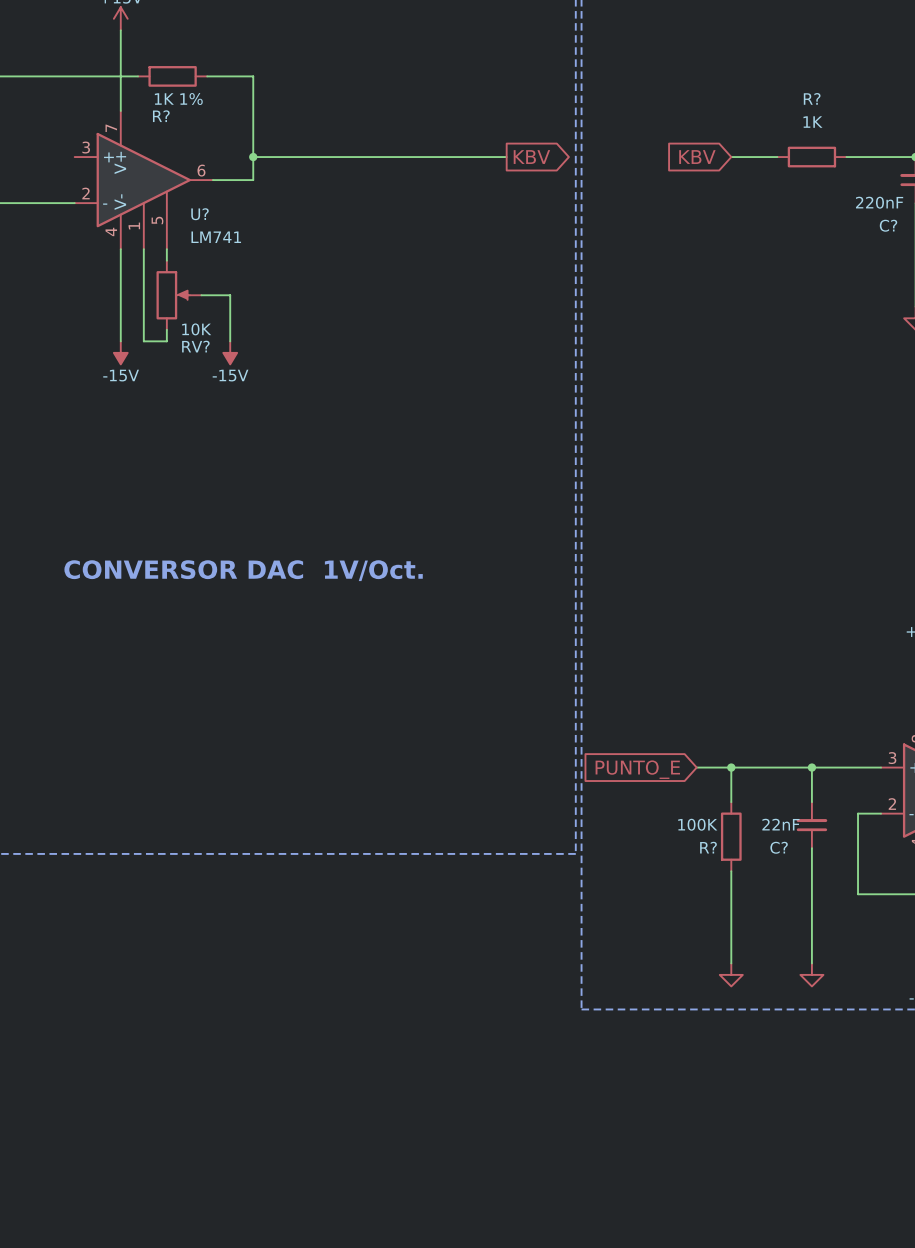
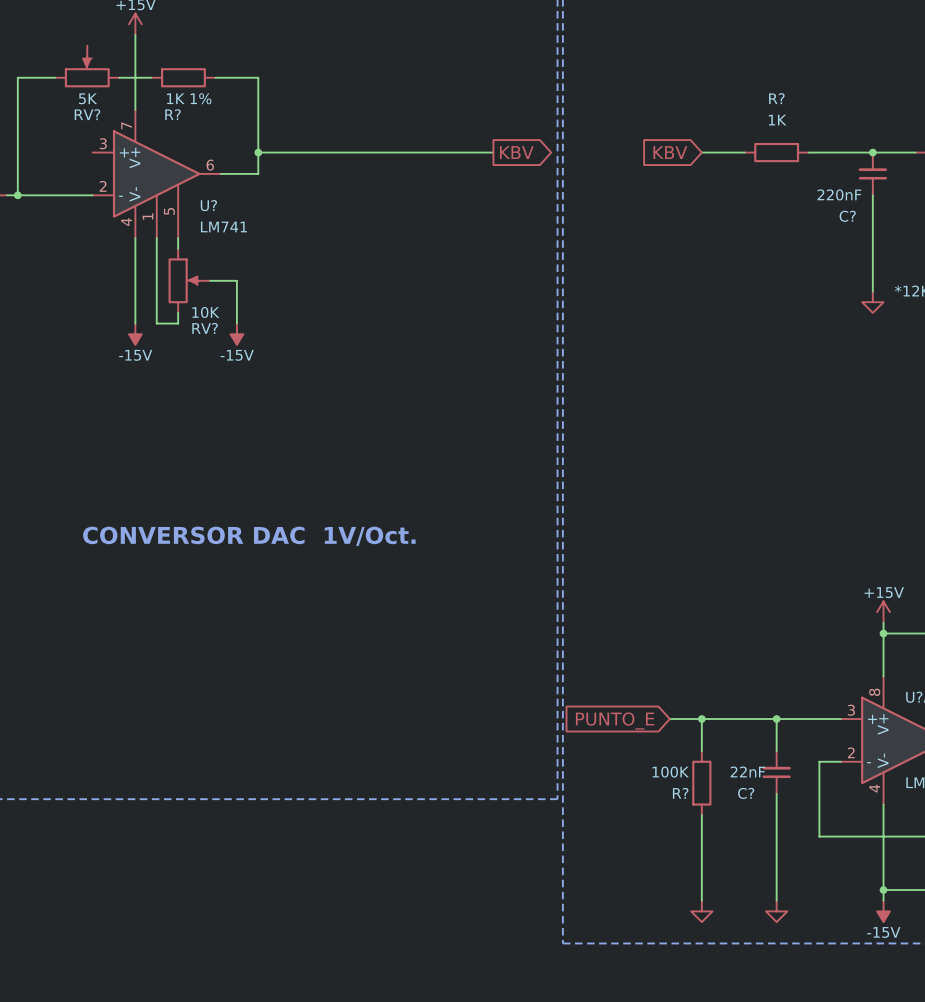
RV?: none -> 5K (87, 66)
wire: (34, 76) (103, 76) -> none

